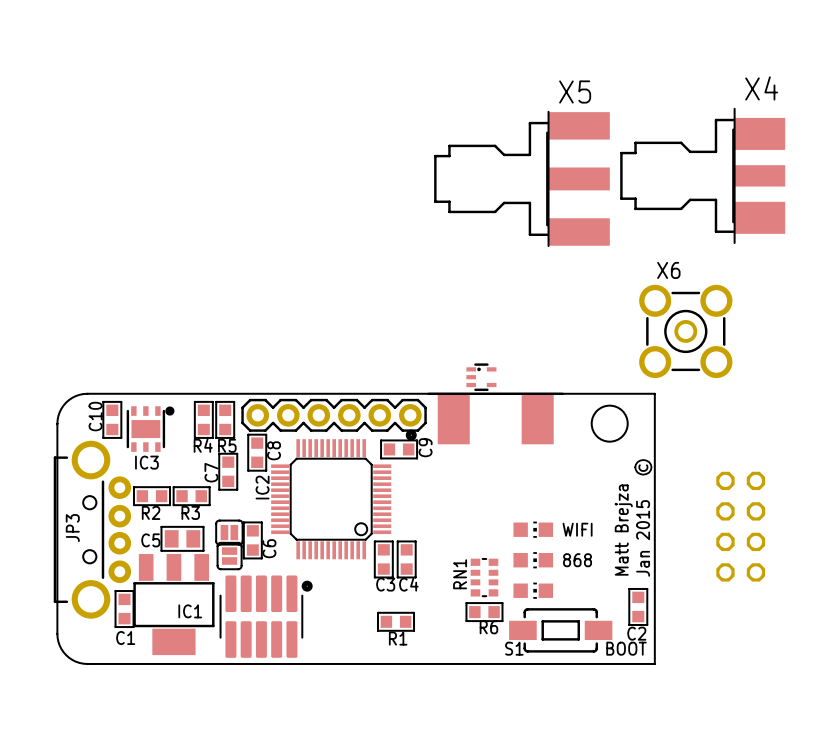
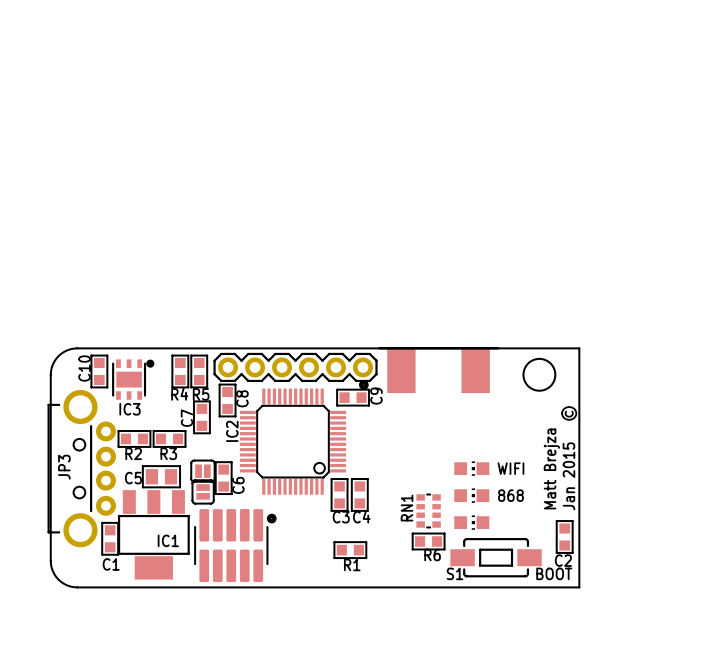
X4: (702, 175) -> none
X5: (521, 178) -> none
X6: (685, 331) -> none
part: (481, 377) -> none
part: (740, 526) -> none

